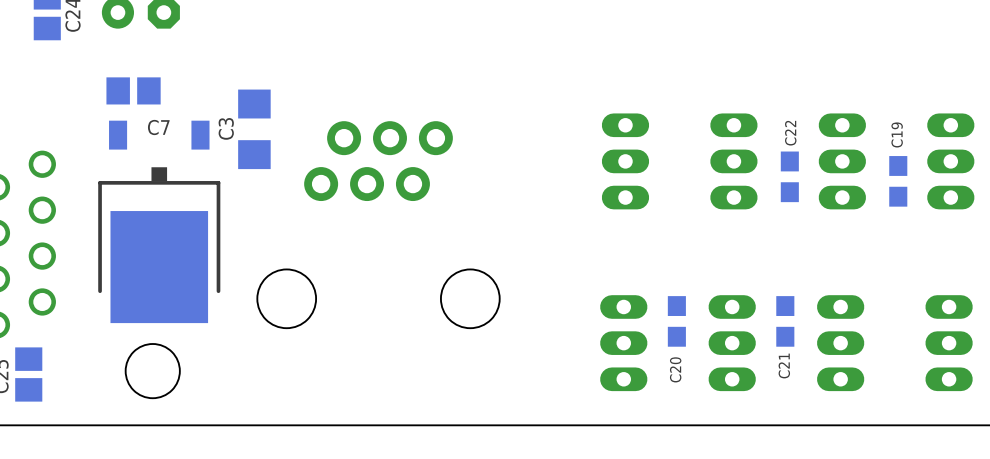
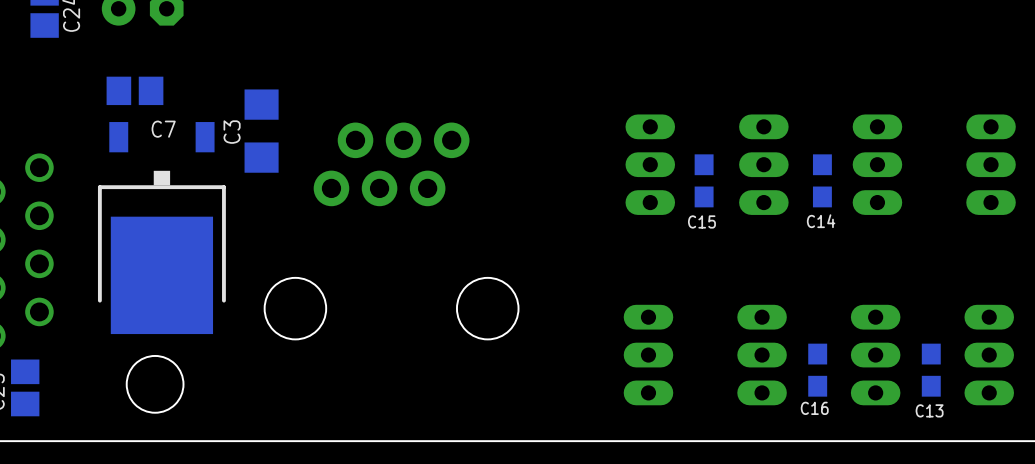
C22 name: C22 (790, 133) -> C14 (821, 221)
C15: none -> (704, 180)
C19: (898, 181) -> none
C20: (676, 321) -> none
C21: (785, 321) -> none
C16: none -> (817, 370)
C13: none -> (931, 370)

